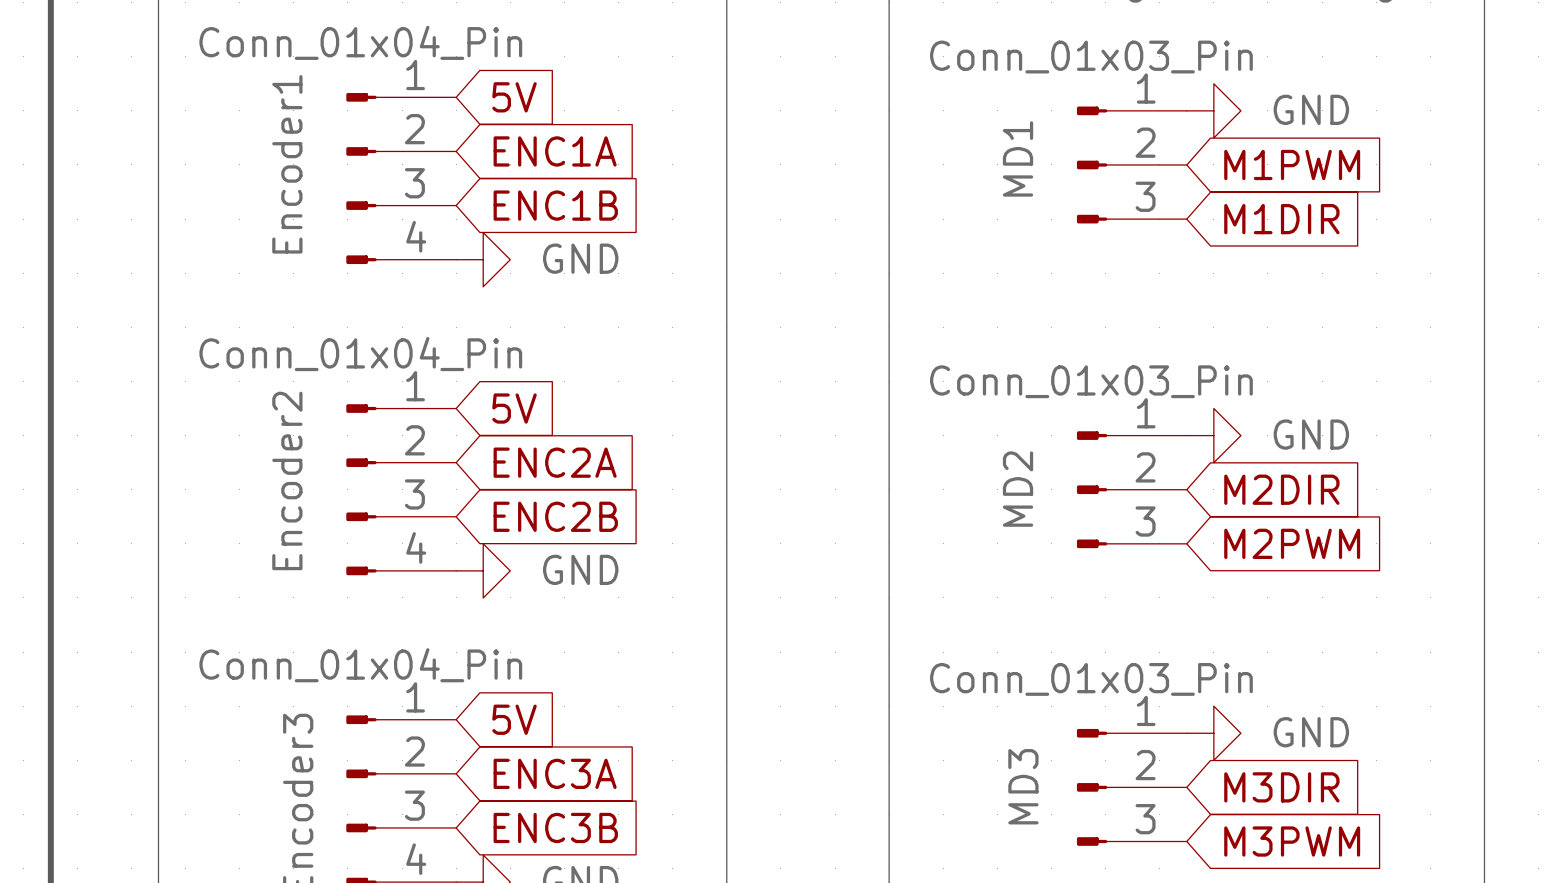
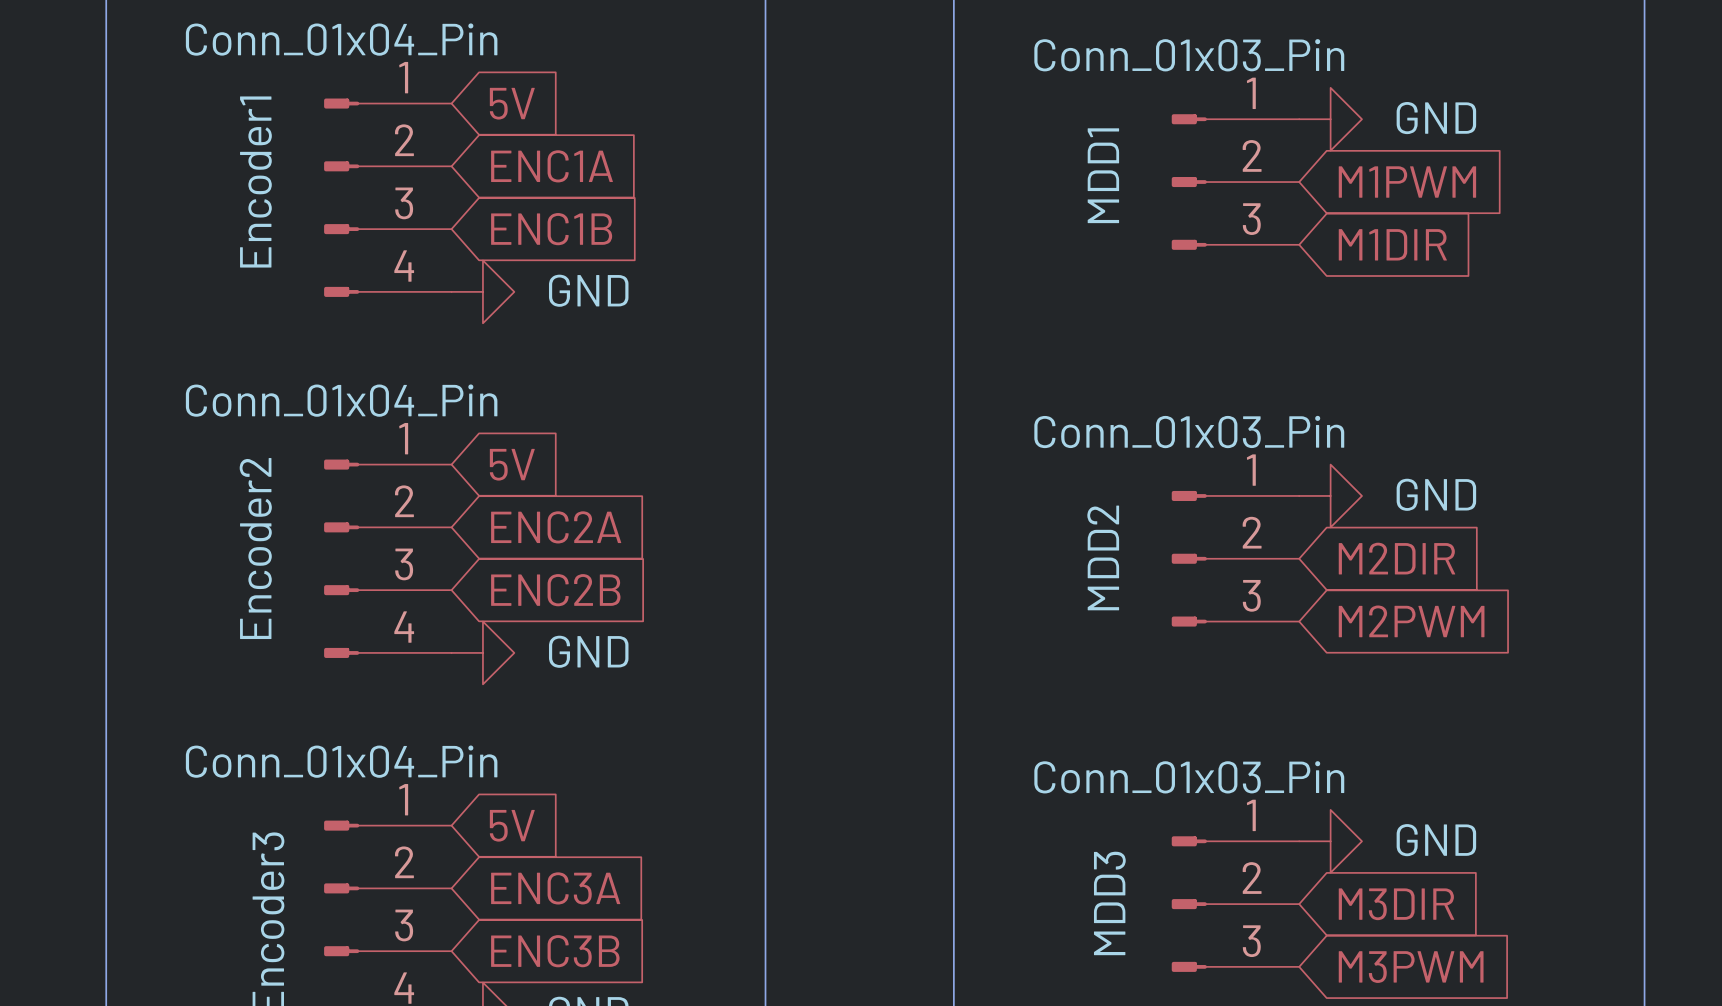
MD1 name: MD1 (1018, 158) -> MDD1 (1103, 175)
MD2 name: MD2 (1018, 489) -> MDD2 (1103, 557)
MD3 name: MD3 (1023, 786) -> MDD3 (1109, 903)

